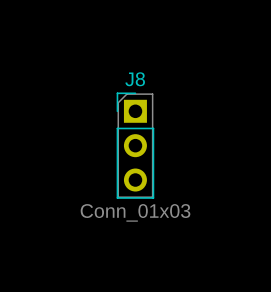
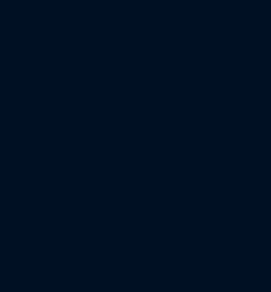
J8: Conn_01x03 (135, 145) -> none

